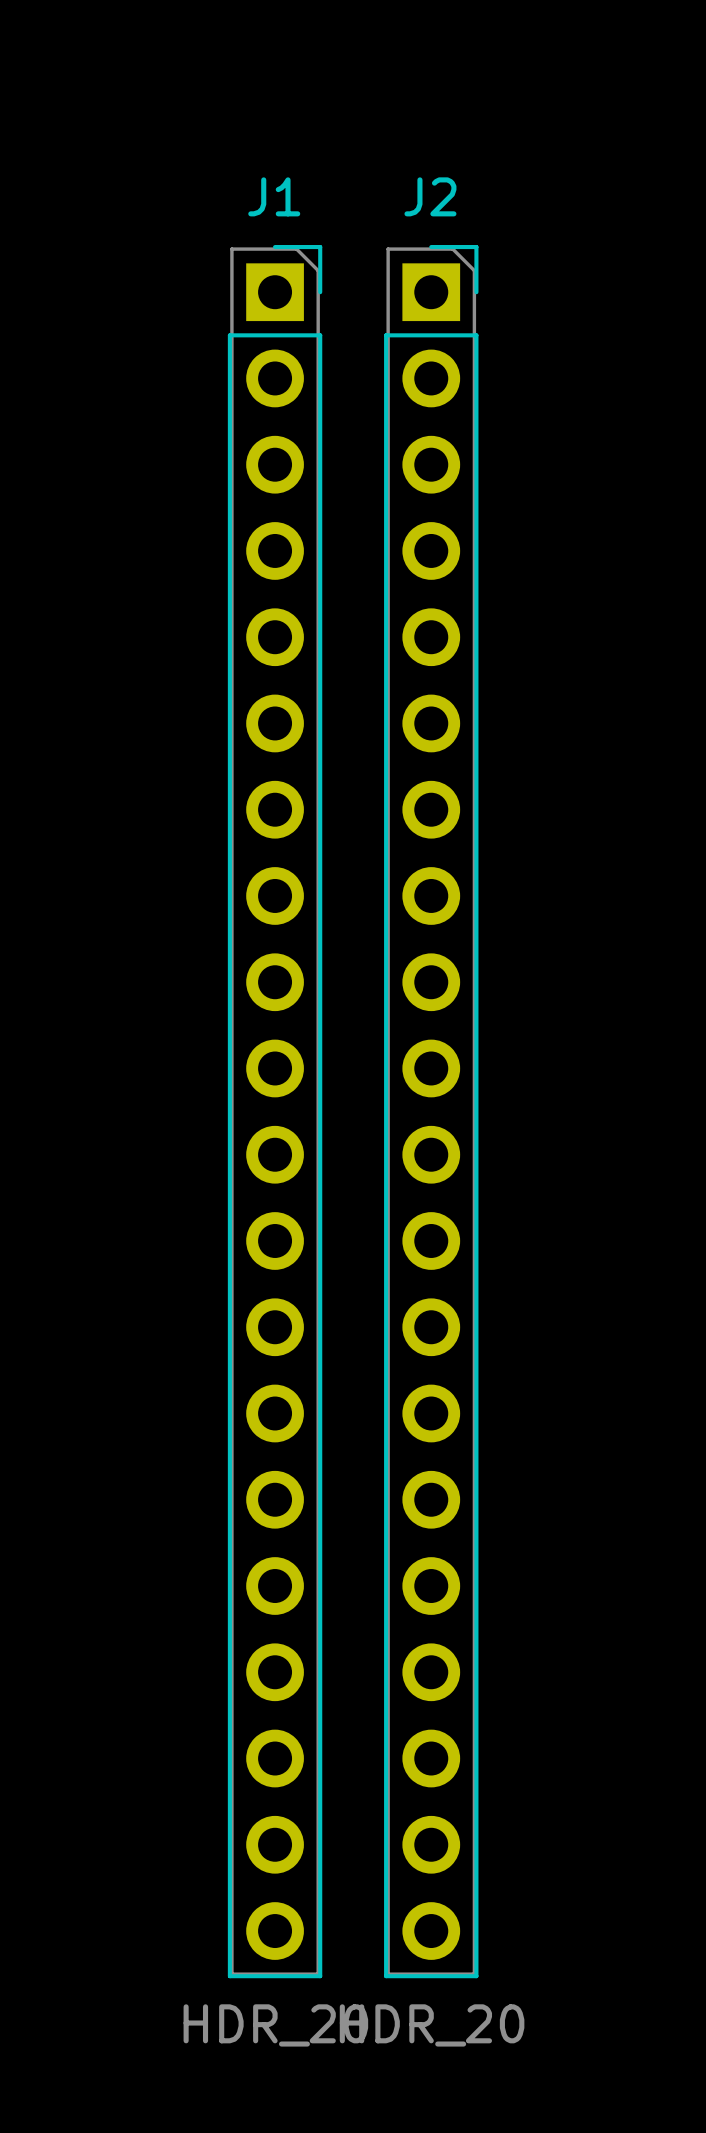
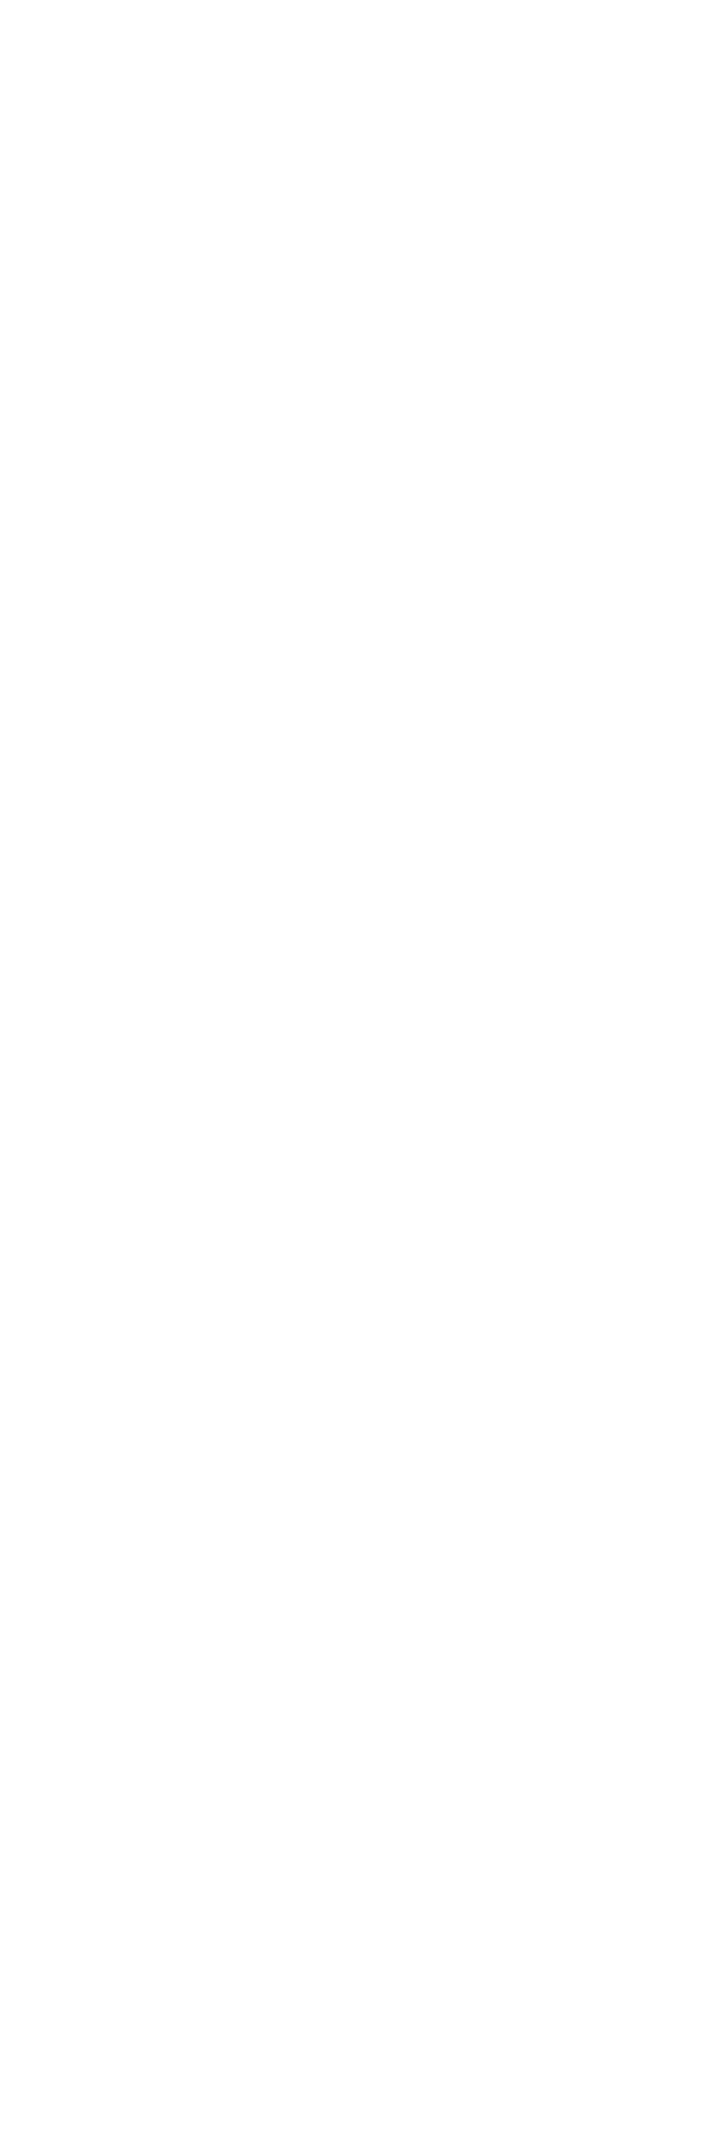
J1: HDR_20 (275, 1111) -> none
J2: HDR_20 (431, 1111) -> none

